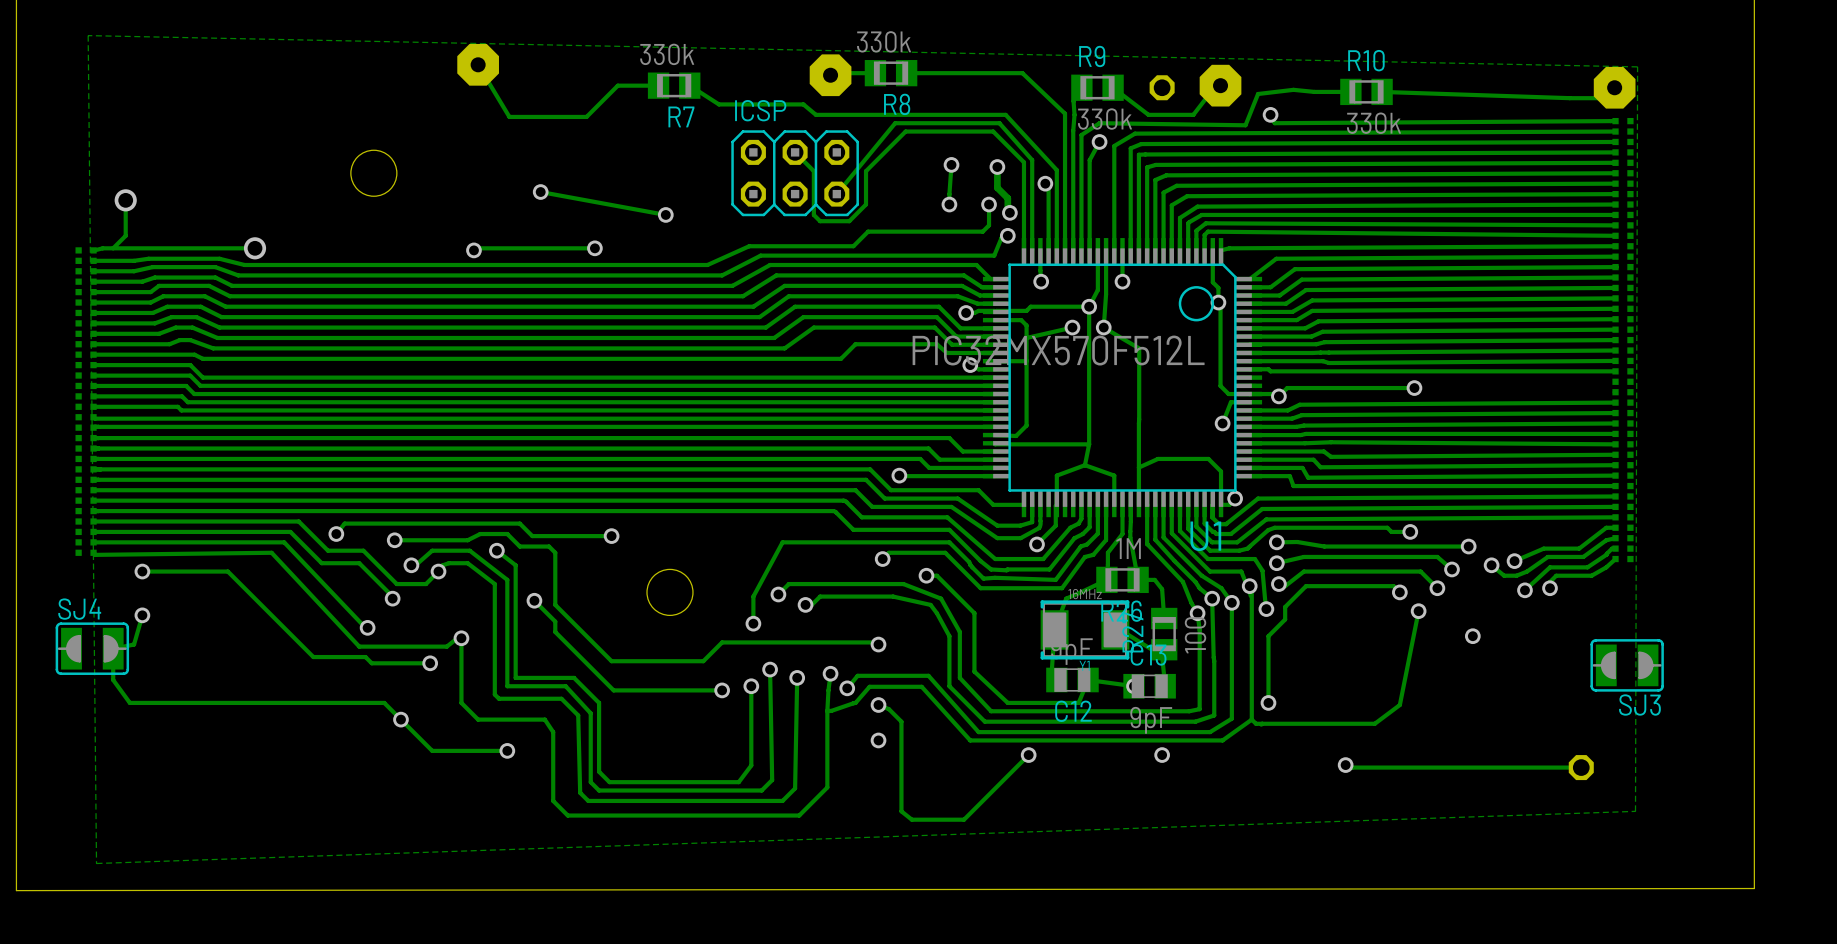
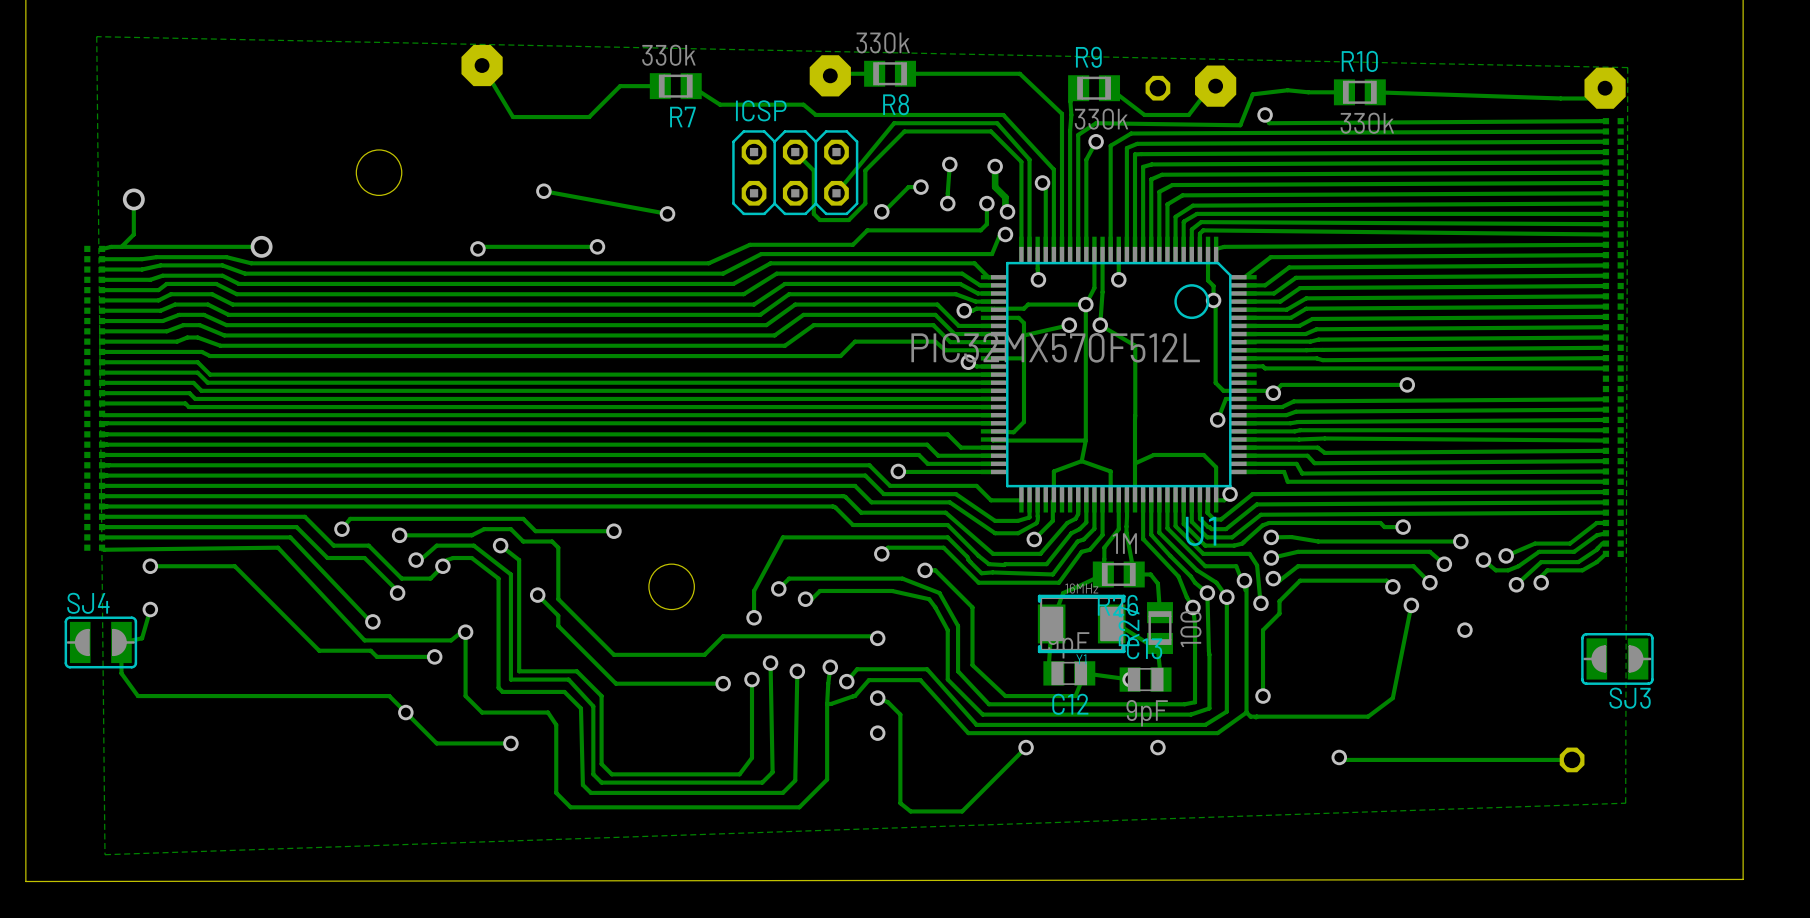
track: none -> (920, 187) (908, 187) (881, 211)
via: none -> (920, 187)
via: none -> (881, 211)

